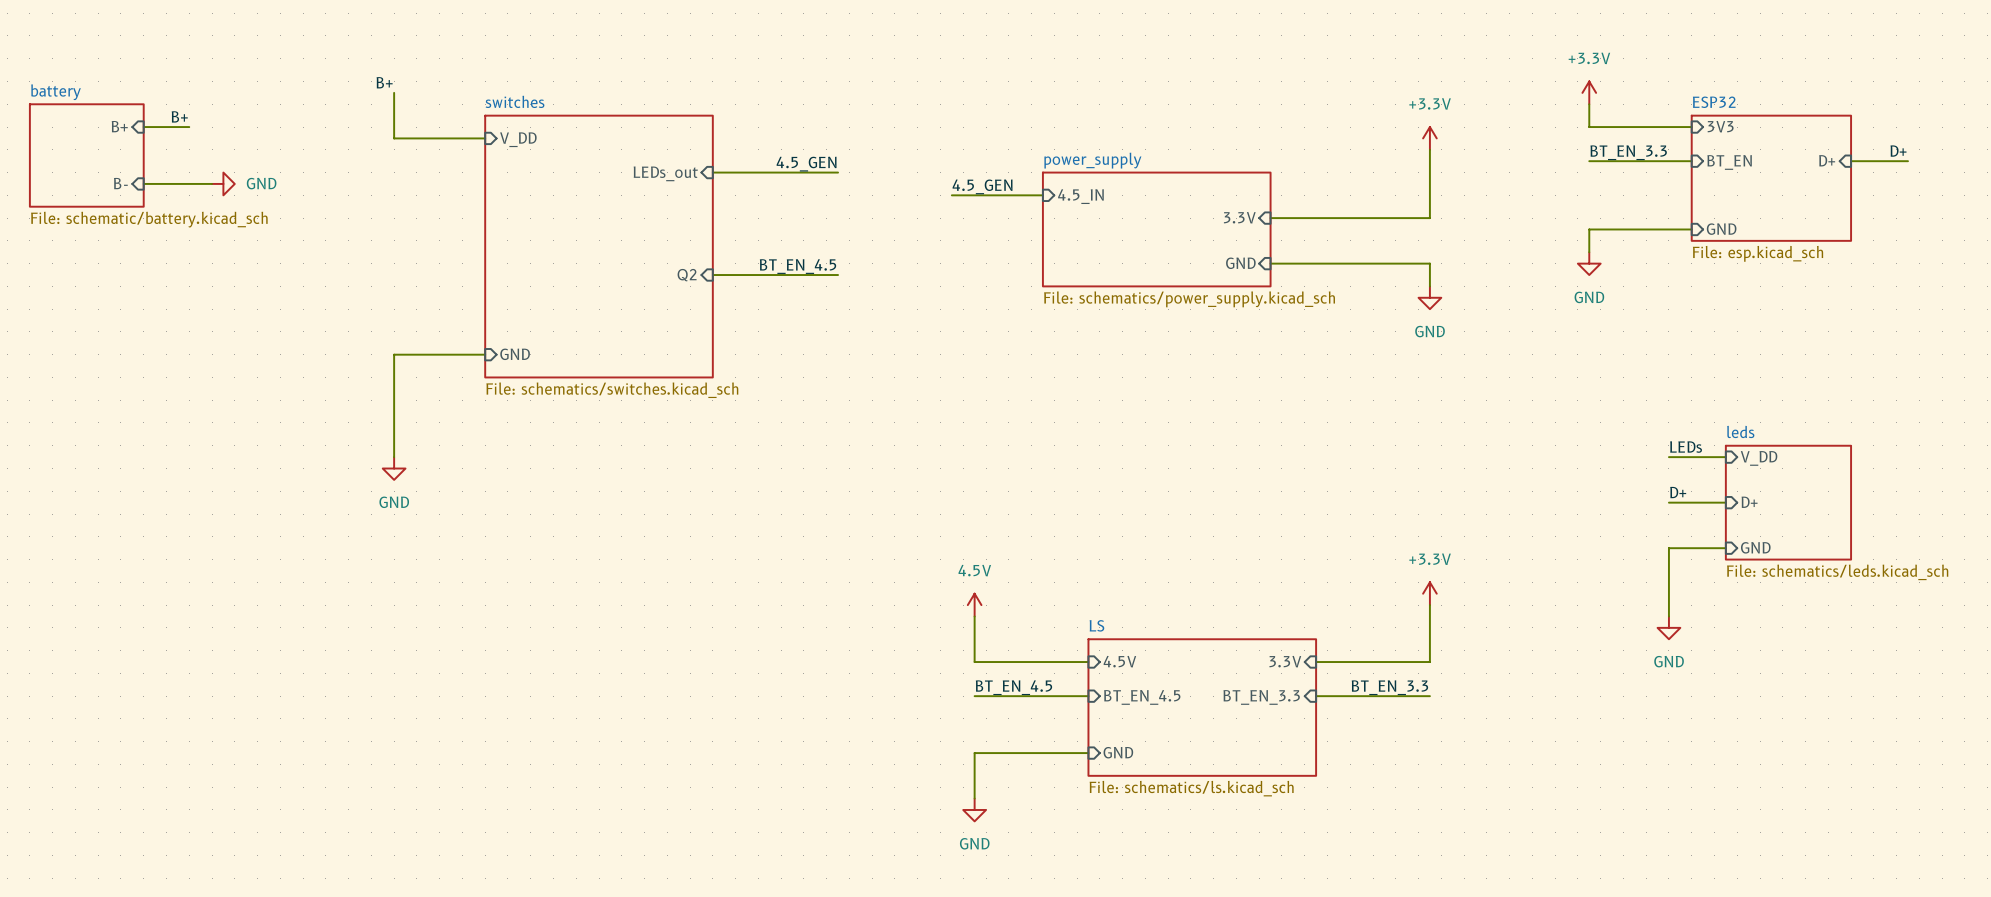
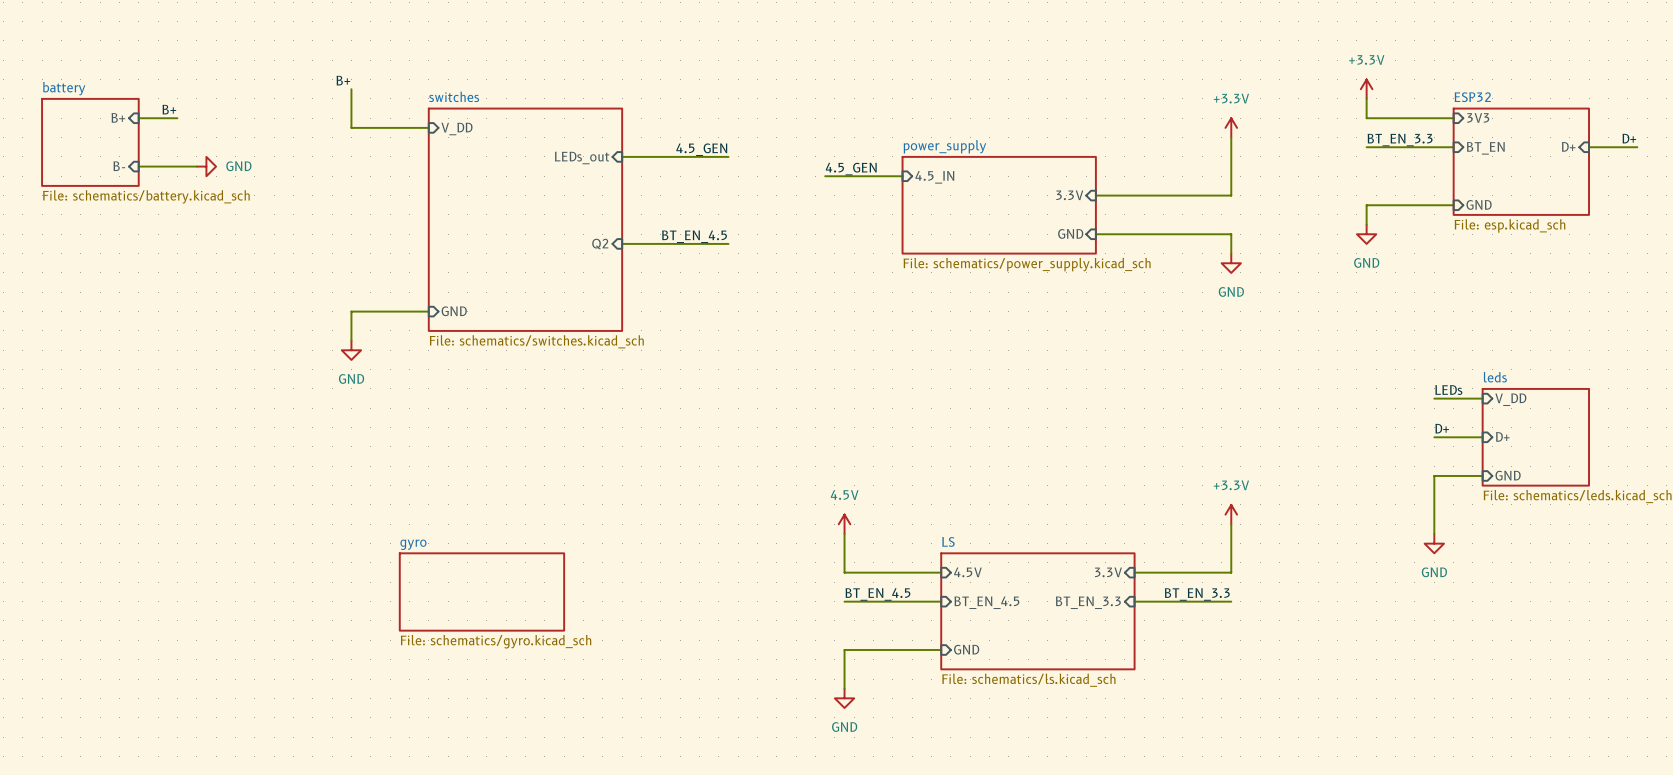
sheet battery value: File: schematic/battery.kicad_sch (149, 219) -> File: schematics/battery.kicad_sch (146, 196)
wire: (394, 388) (394, 457) -> none
power symbol position: GND (394, 468) -> GND (351, 350)
sheet gyro: none -> File: schematics/gyro.kicad_sch (481, 591)

